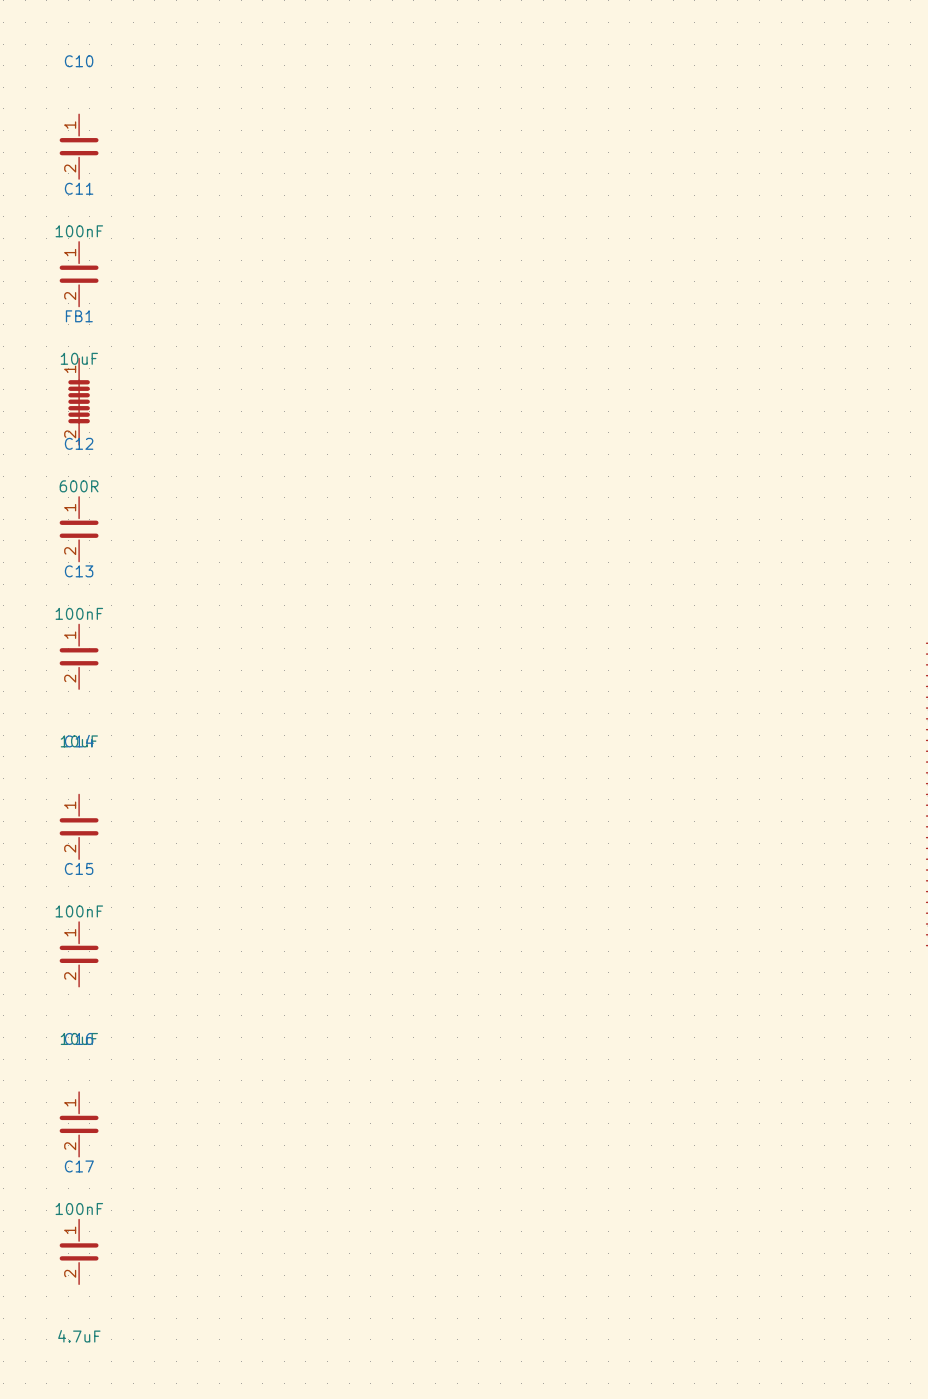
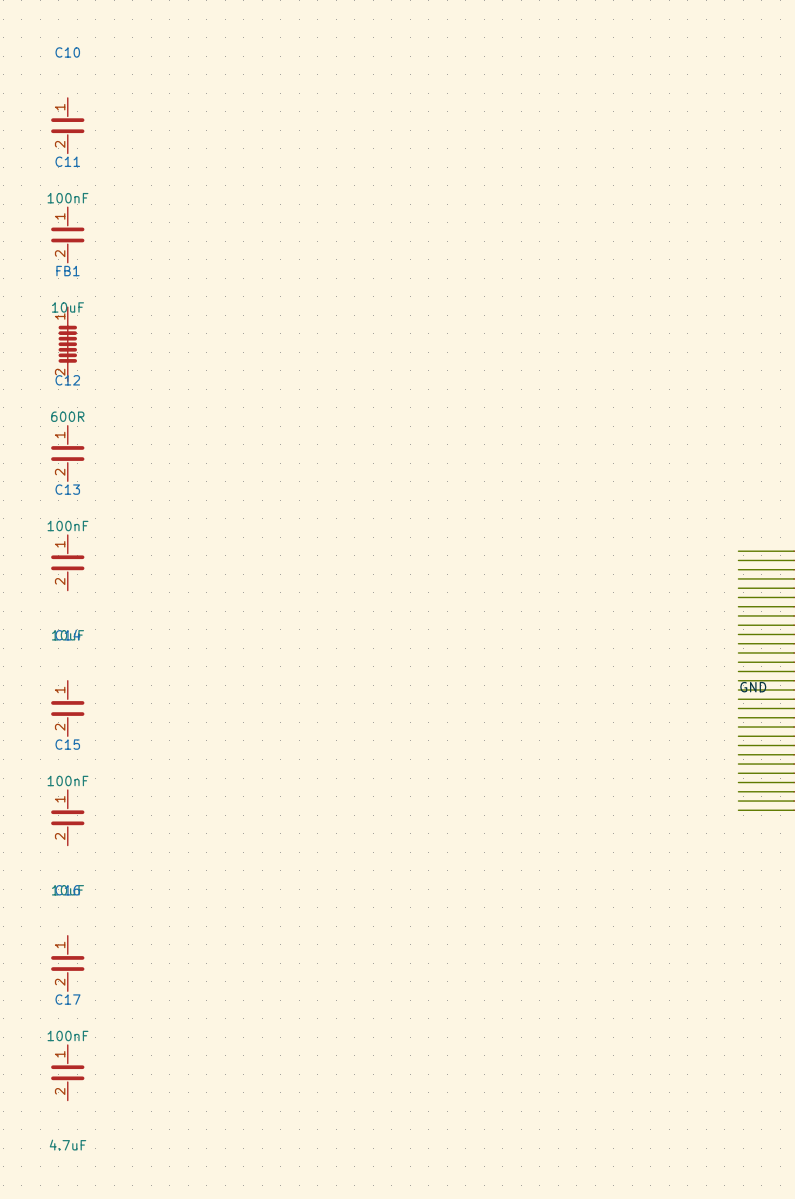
wire: none -> (738, 551) (793, 551)
wire: none -> (738, 560) (793, 560)
wire: none -> (738, 569) (793, 569)
wire: none -> (738, 578) (793, 578)
wire: none -> (738, 588) (793, 588)
wire: none -> (738, 597) (793, 597)
wire: none -> (738, 606) (793, 606)
wire: none -> (738, 615) (793, 615)
wire: none -> (738, 625) (793, 625)
wire: none -> (738, 634) (793, 634)
wire: none -> (738, 643) (793, 643)
wire: none -> (738, 652) (793, 652)
wire: none -> (738, 662) (793, 662)
wire: none -> (738, 671) (793, 671)
wire: none -> (738, 680) (793, 680)
label: none -> GND (753, 687)
wire: none -> (738, 689) (793, 689)
wire: none -> (738, 699) (793, 699)
wire: none -> (738, 708) (793, 708)
wire: none -> (738, 717) (793, 717)
wire: none -> (738, 727) (793, 727)
wire: none -> (738, 736) (793, 736)
wire: none -> (738, 745) (793, 745)
wire: none -> (738, 754) (793, 754)
wire: none -> (738, 764) (793, 764)
wire: none -> (738, 773) (793, 773)
wire: none -> (738, 782) (793, 782)
wire: none -> (738, 791) (793, 791)
wire: none -> (738, 801) (793, 801)
wire: none -> (738, 810) (793, 810)

